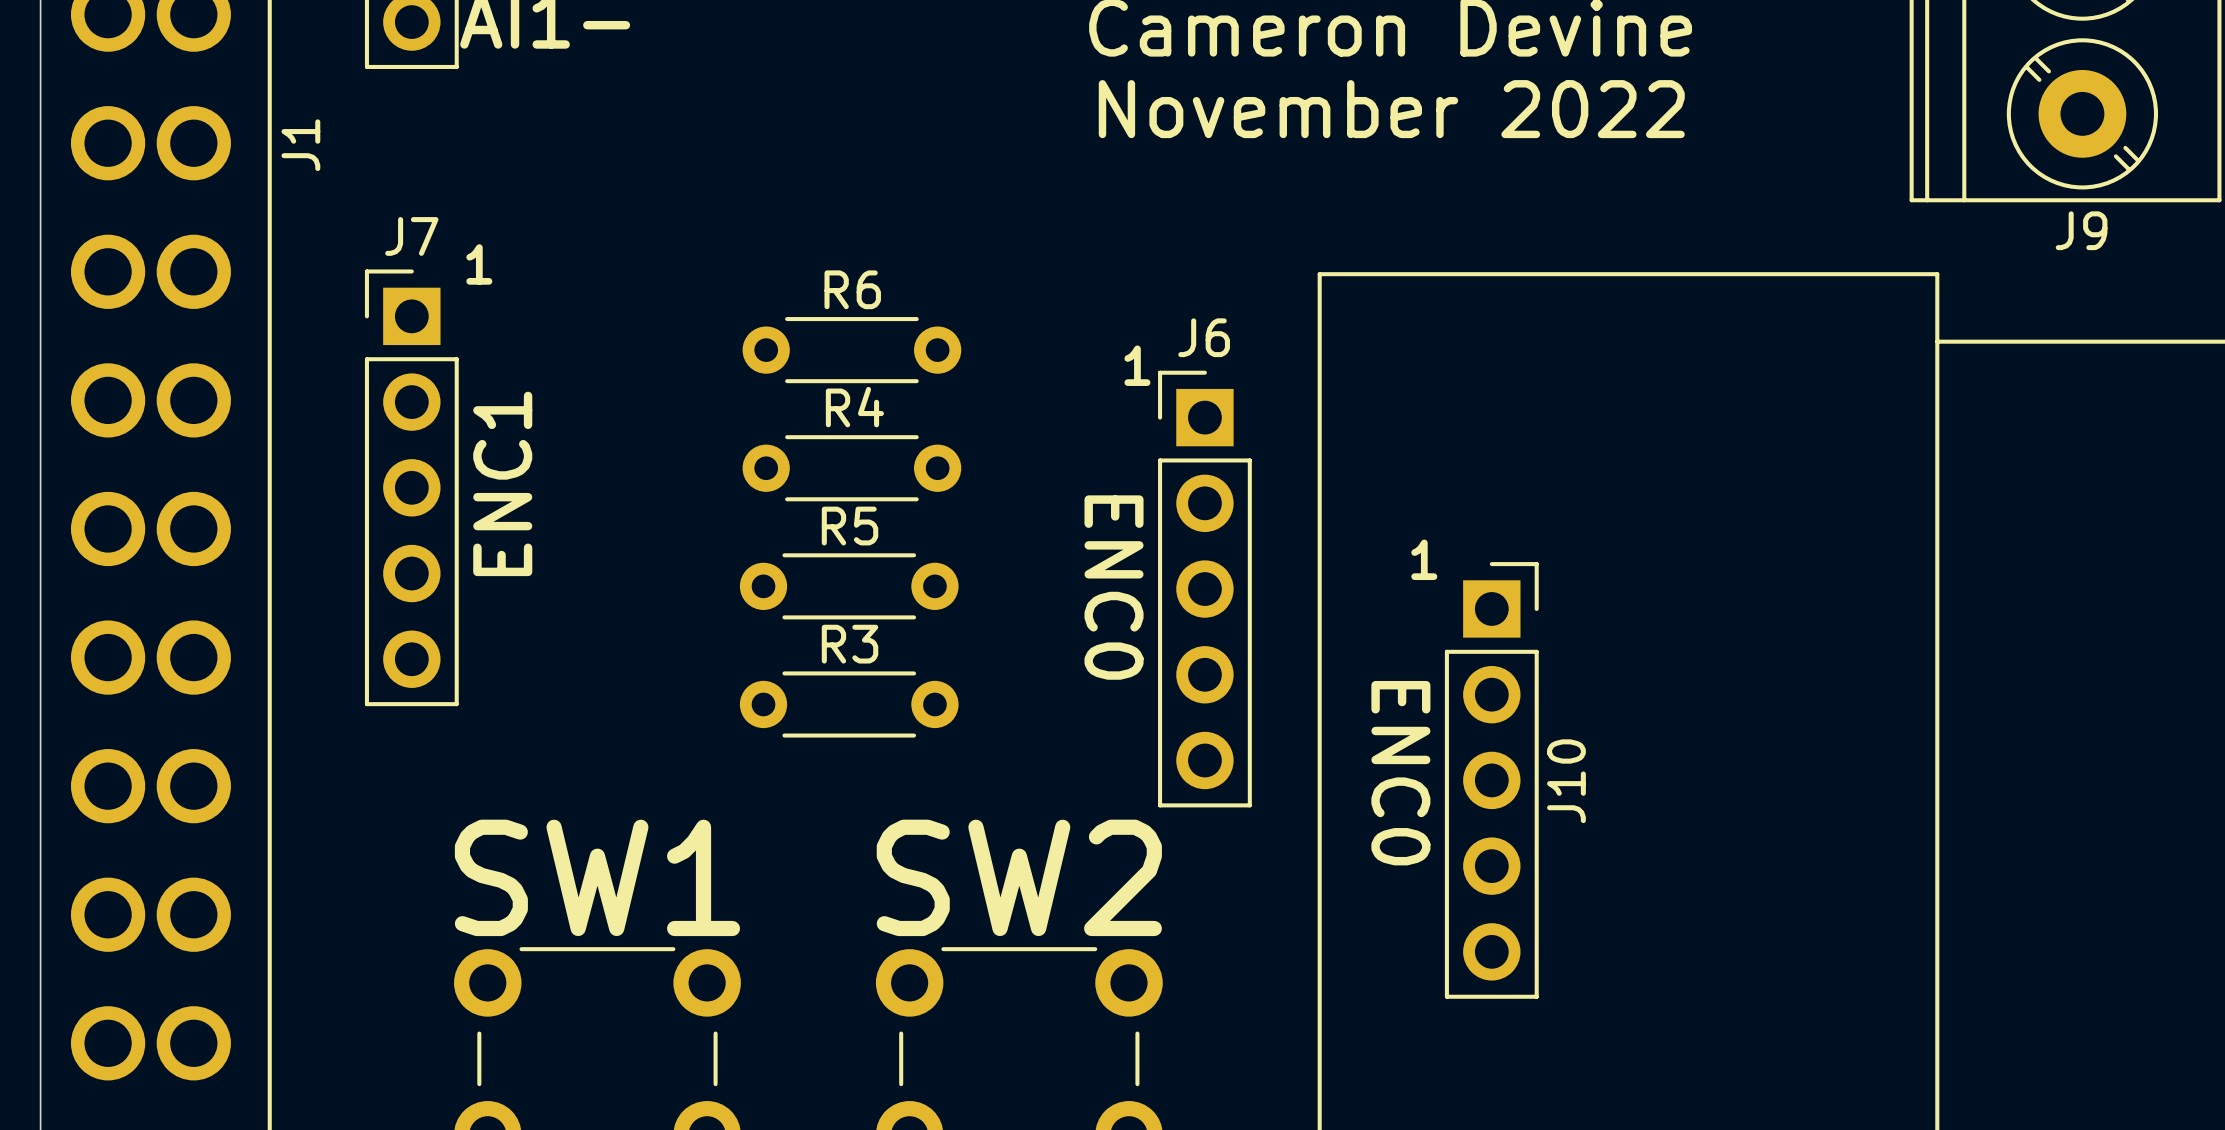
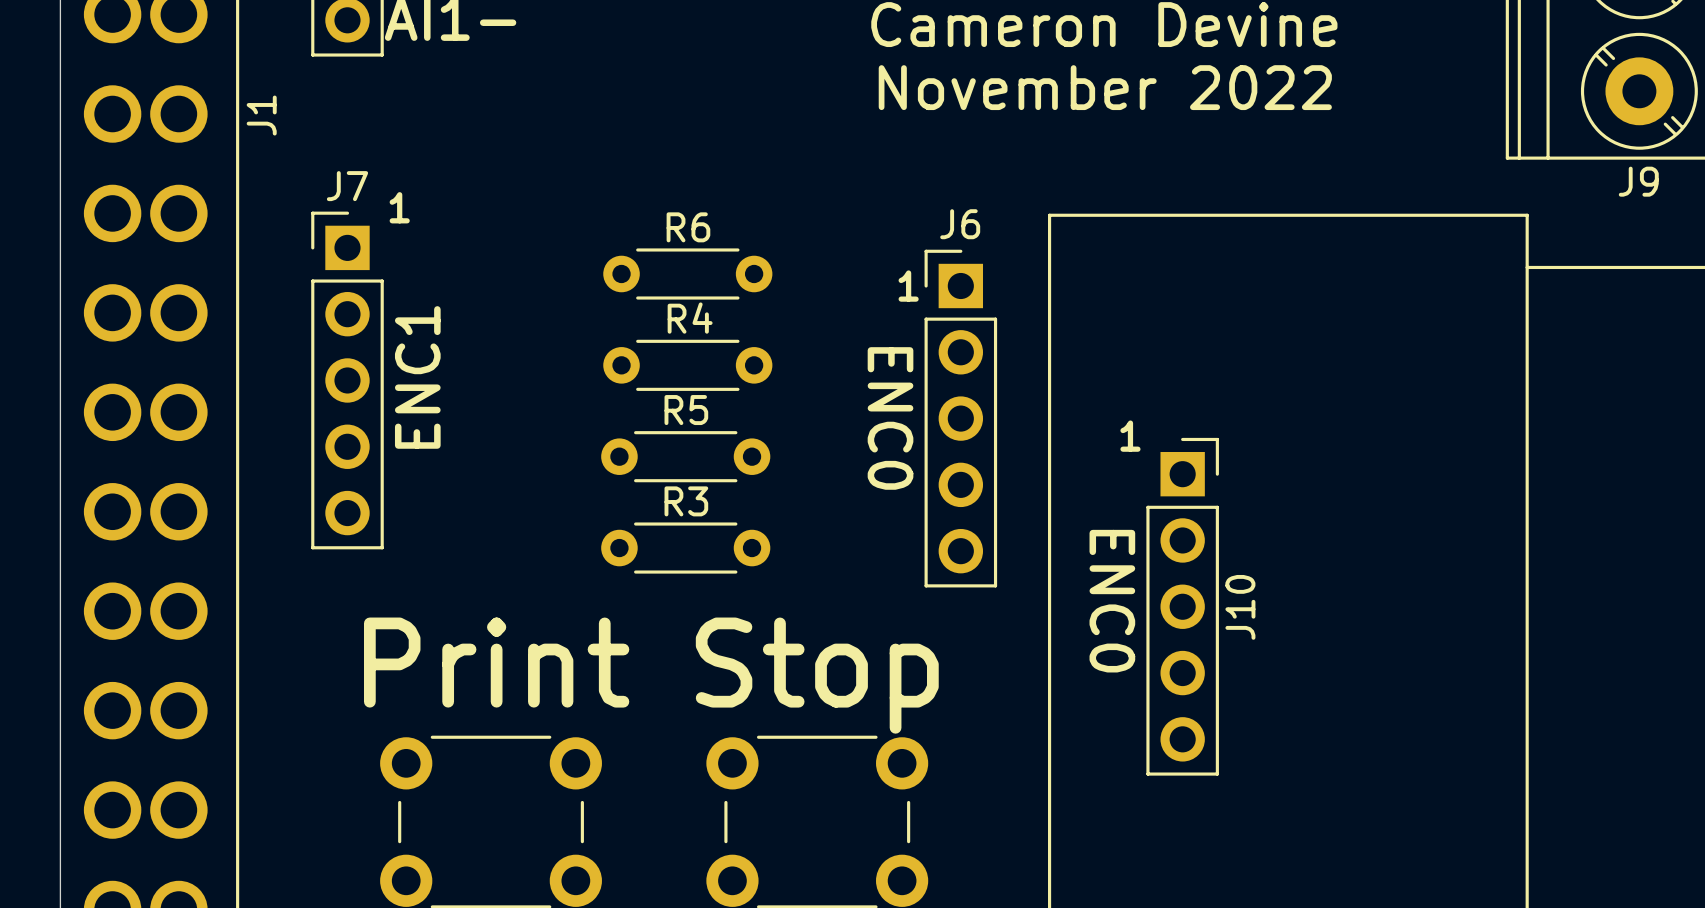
text position: ENC0 (1114, 587) -> ENC0 (890, 418)
J6 position: (1204, 589) -> (960, 418)
SW1 name: SW1 (597, 877) -> Print (496, 662)
SW2 name: SW2 (1019, 877) -> Stop (817, 675)

